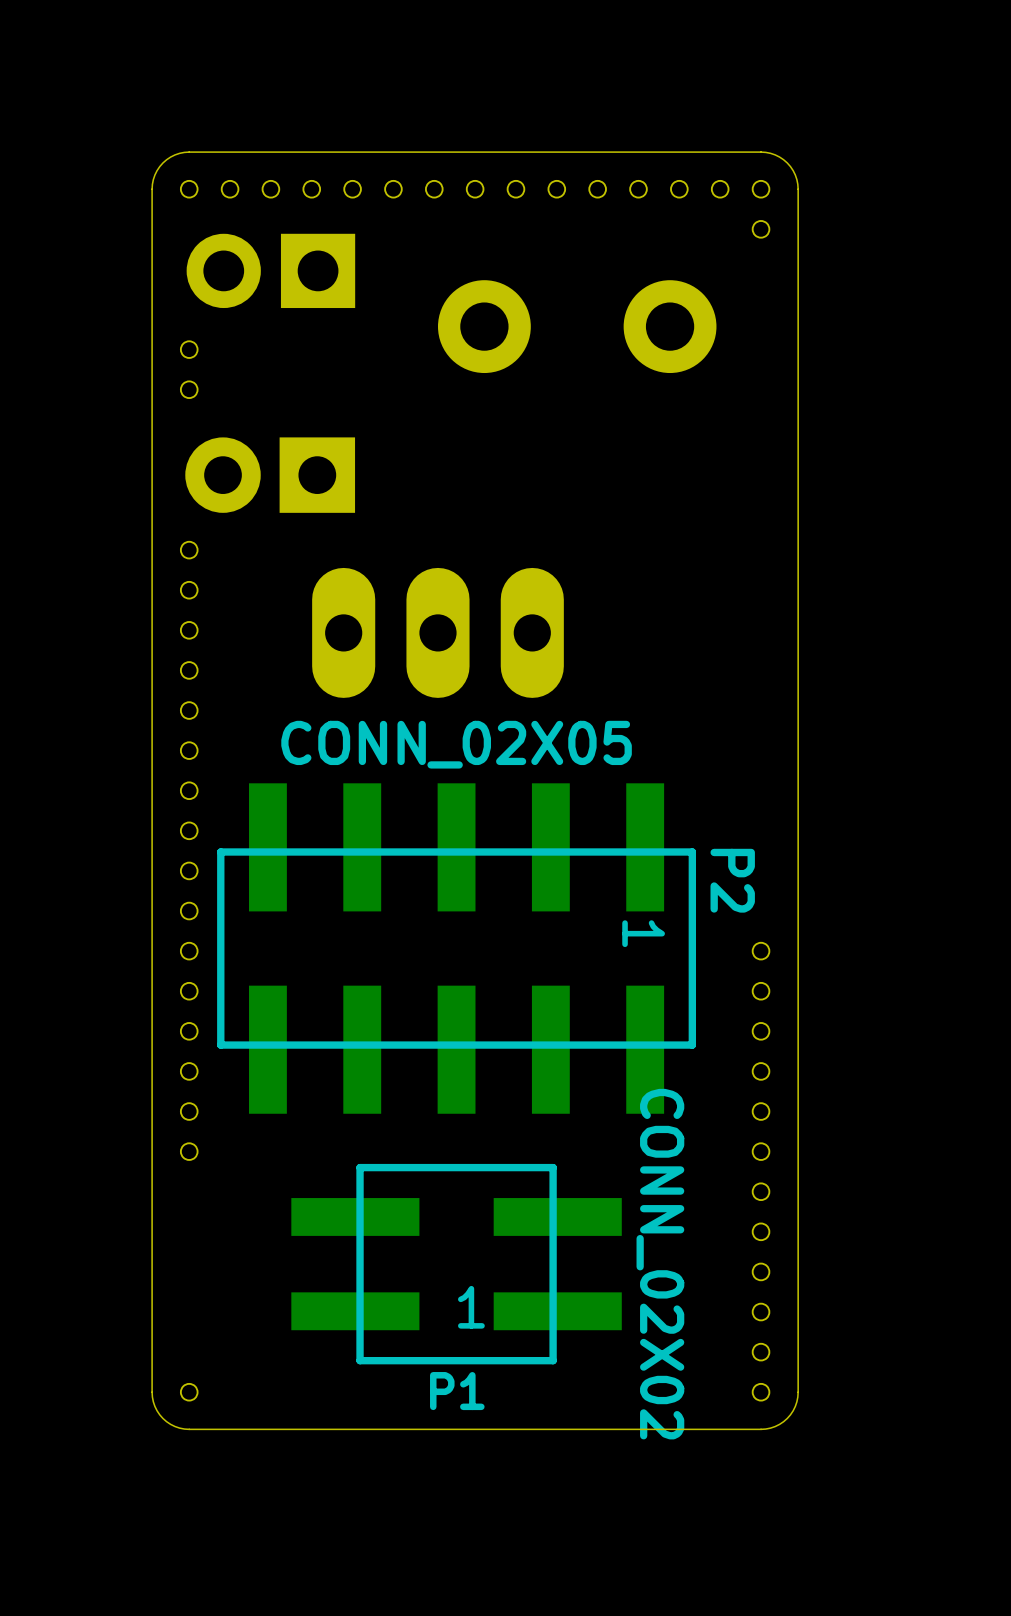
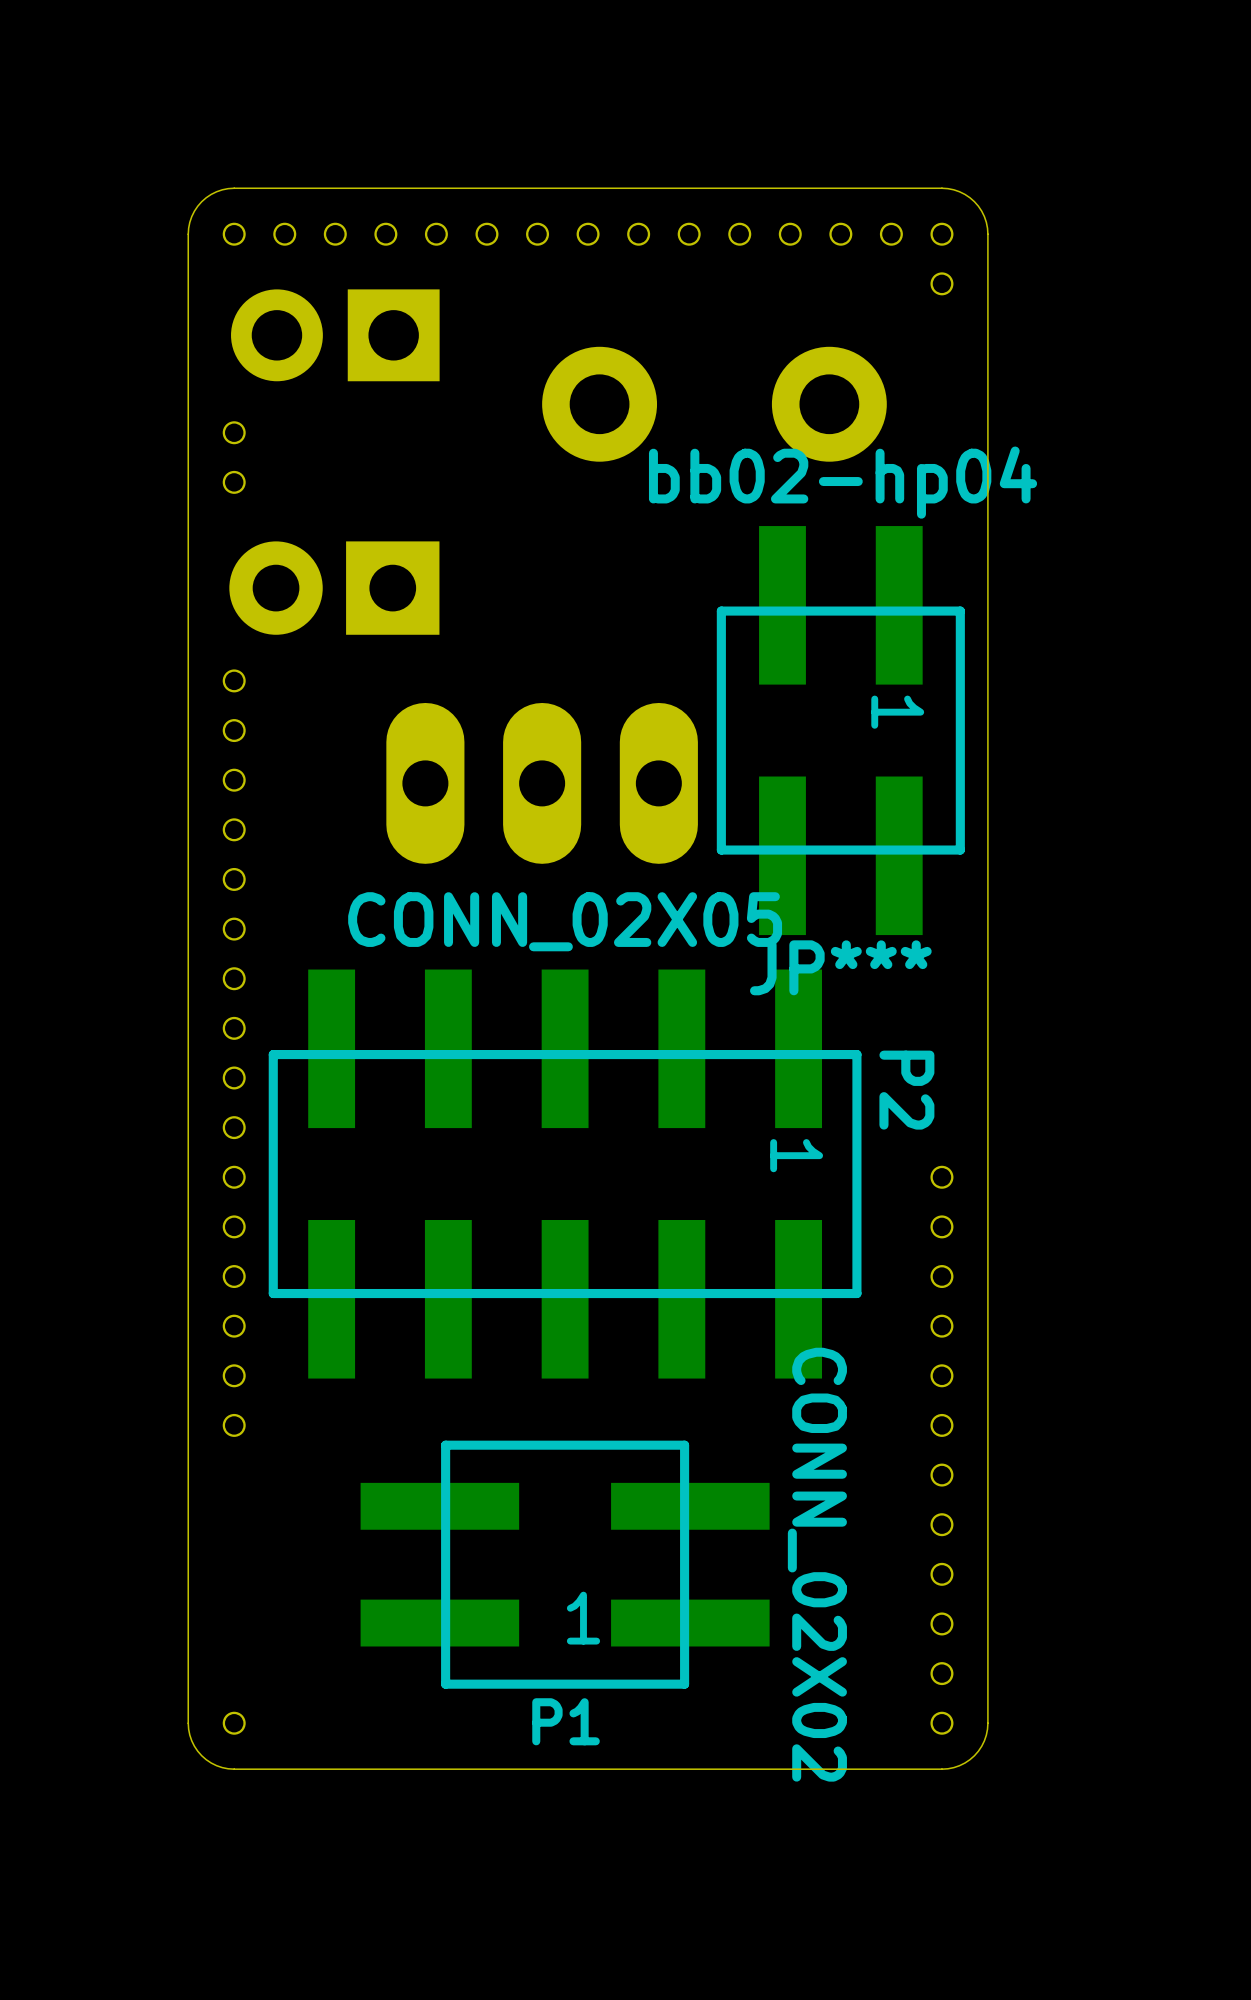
JP***: none -> bb02-hp04 (840, 730)

